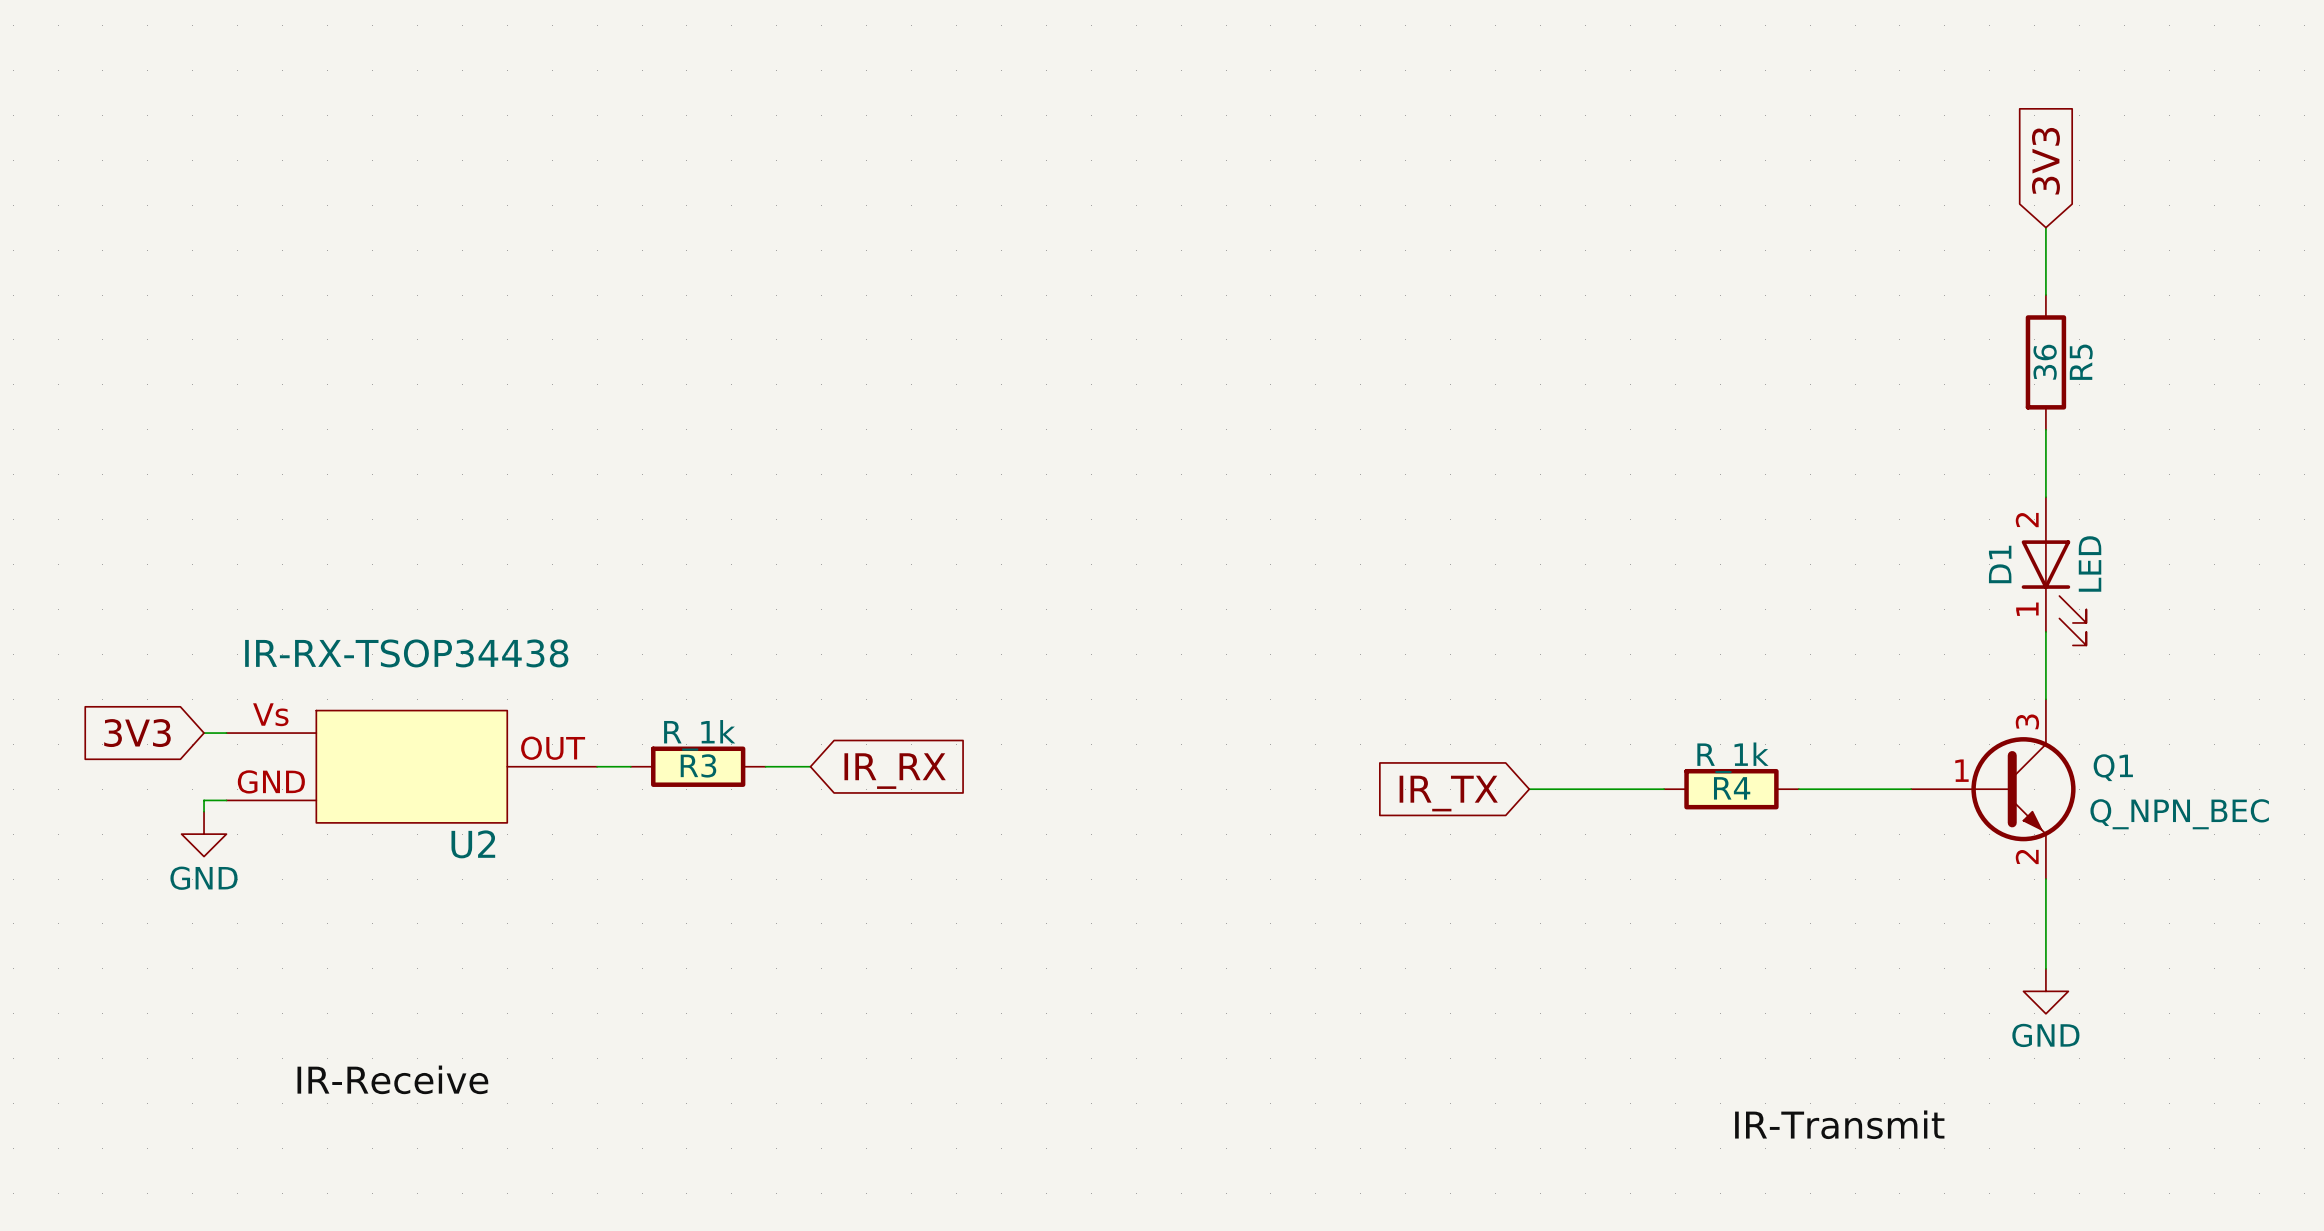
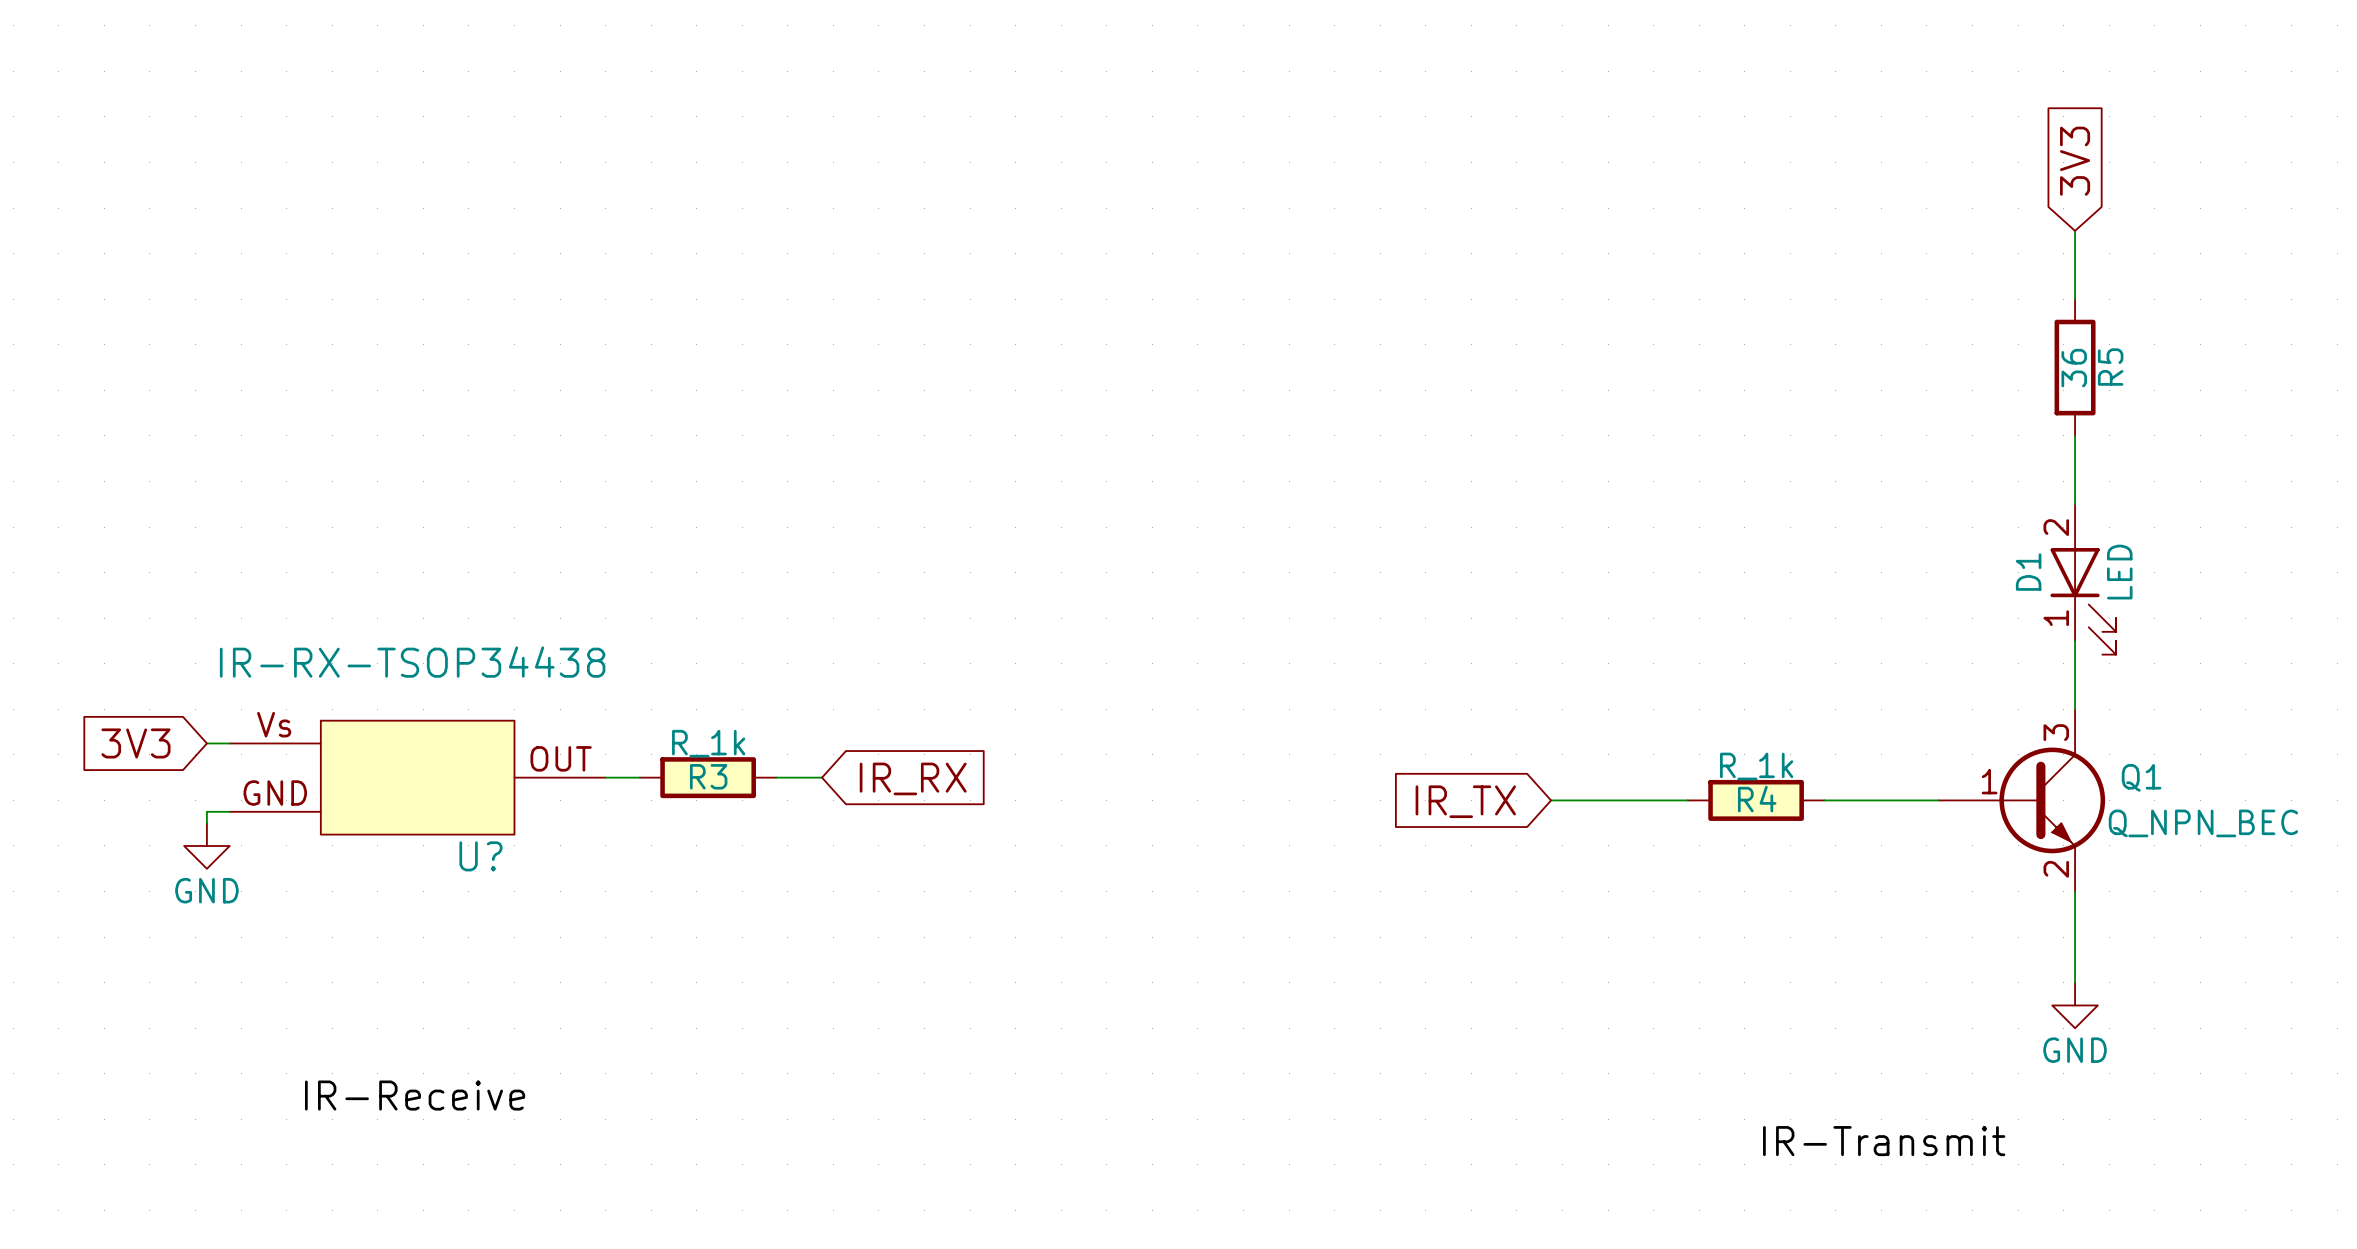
U2 name: U2 (473, 844) -> U? (480, 856)

